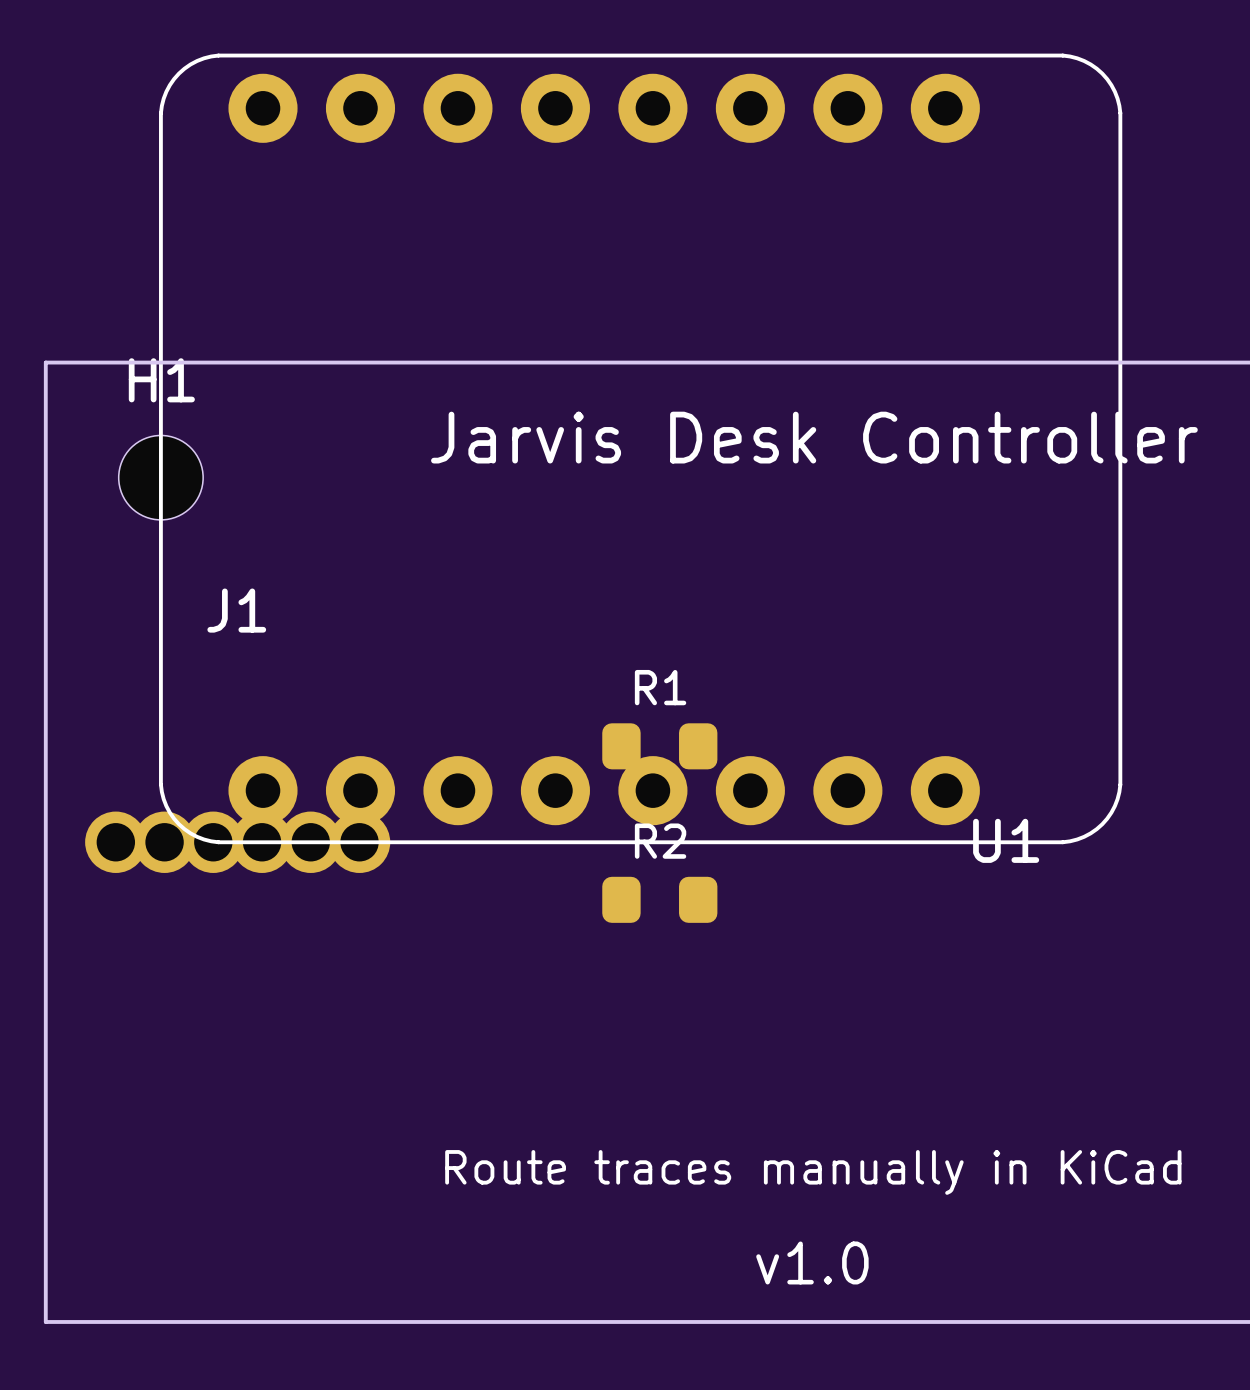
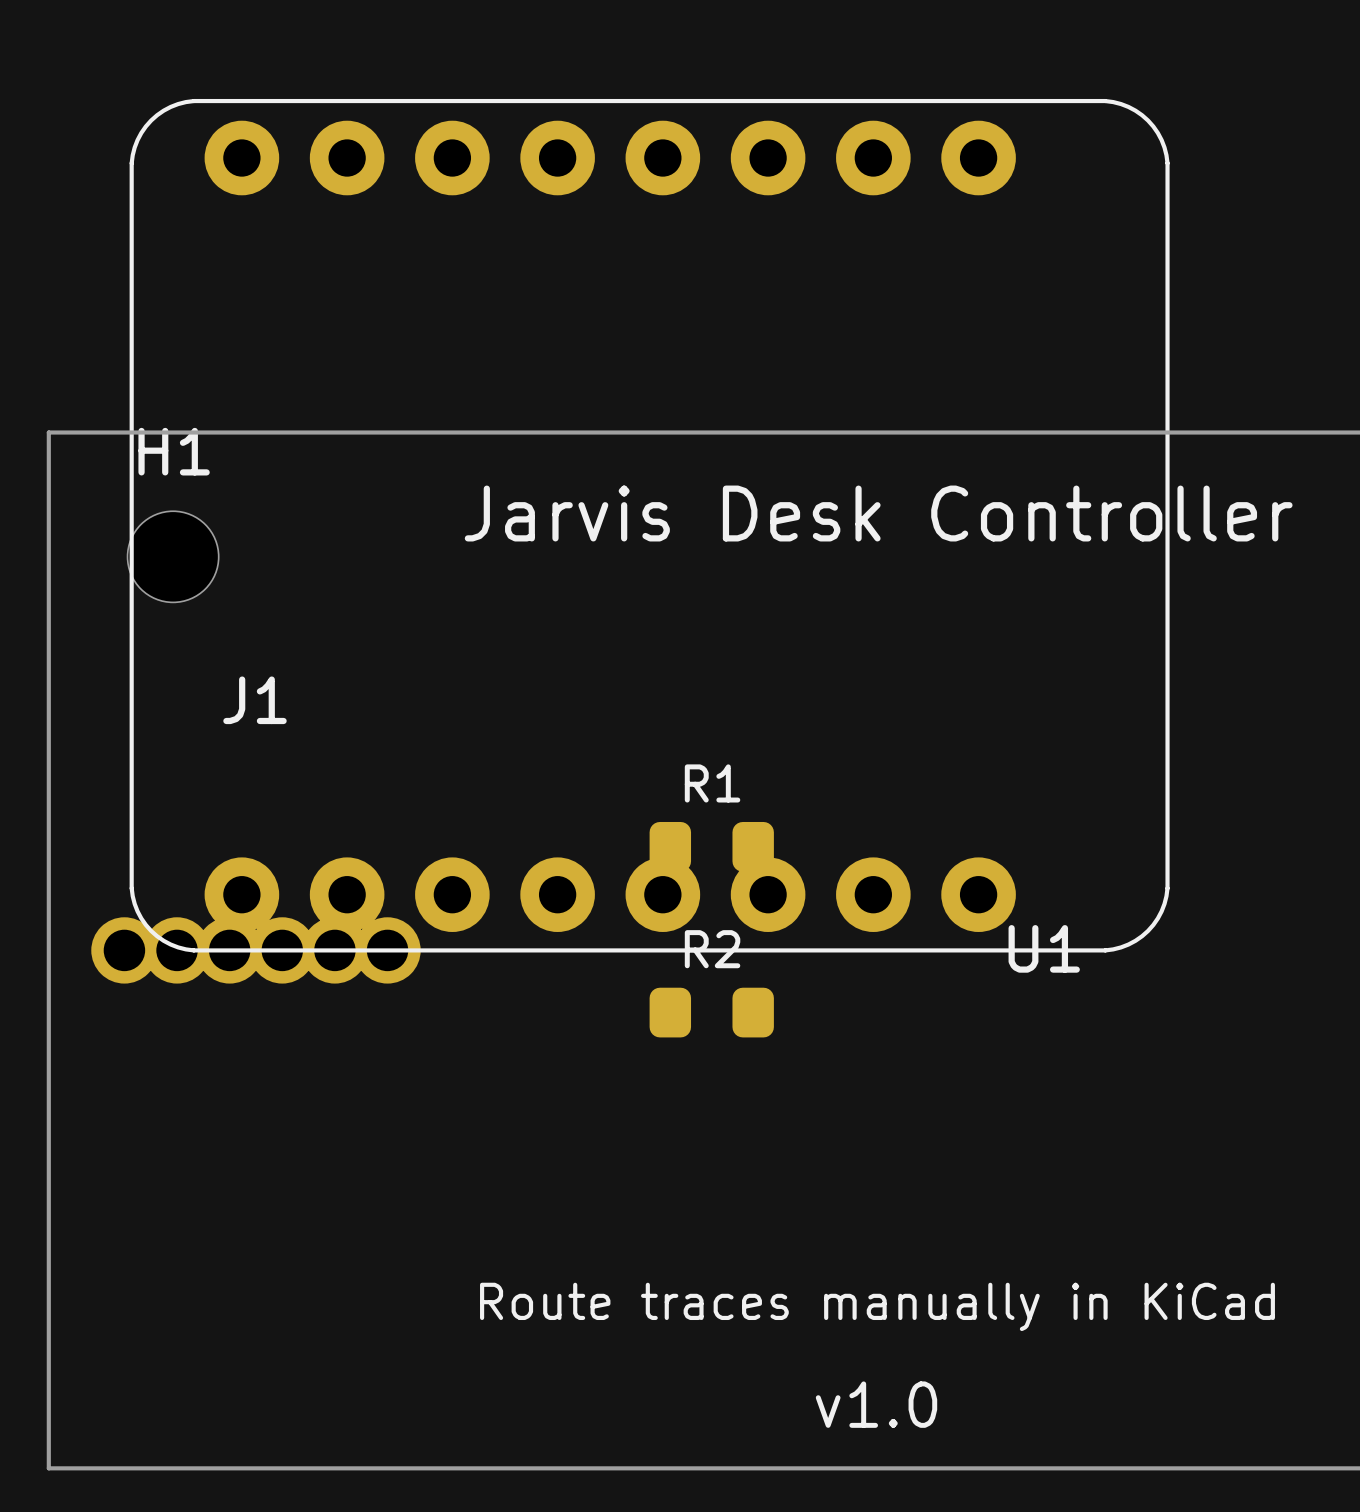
U1 position: (640, 448) -> (649, 525)

